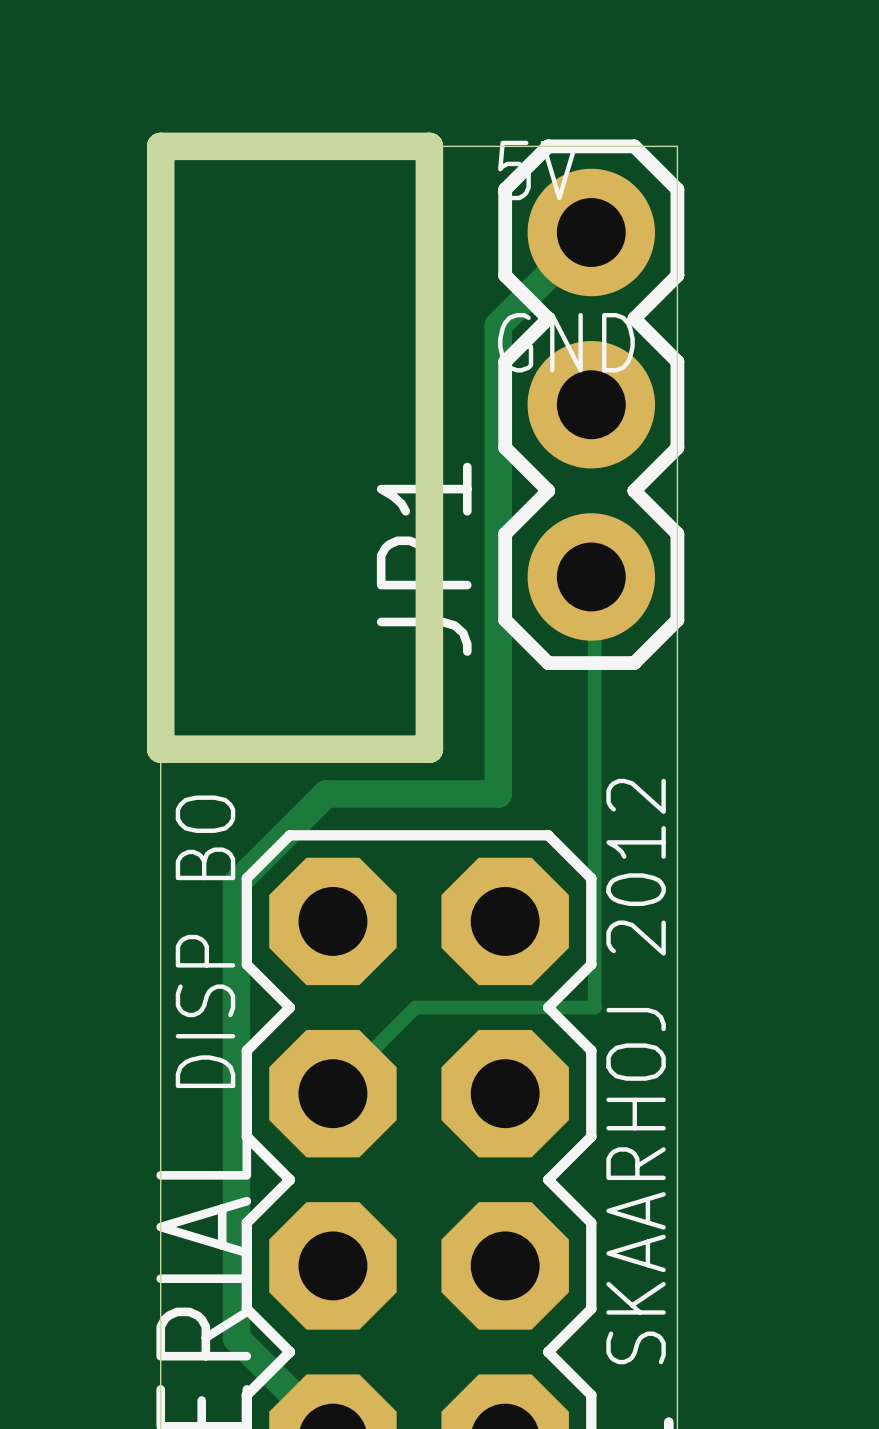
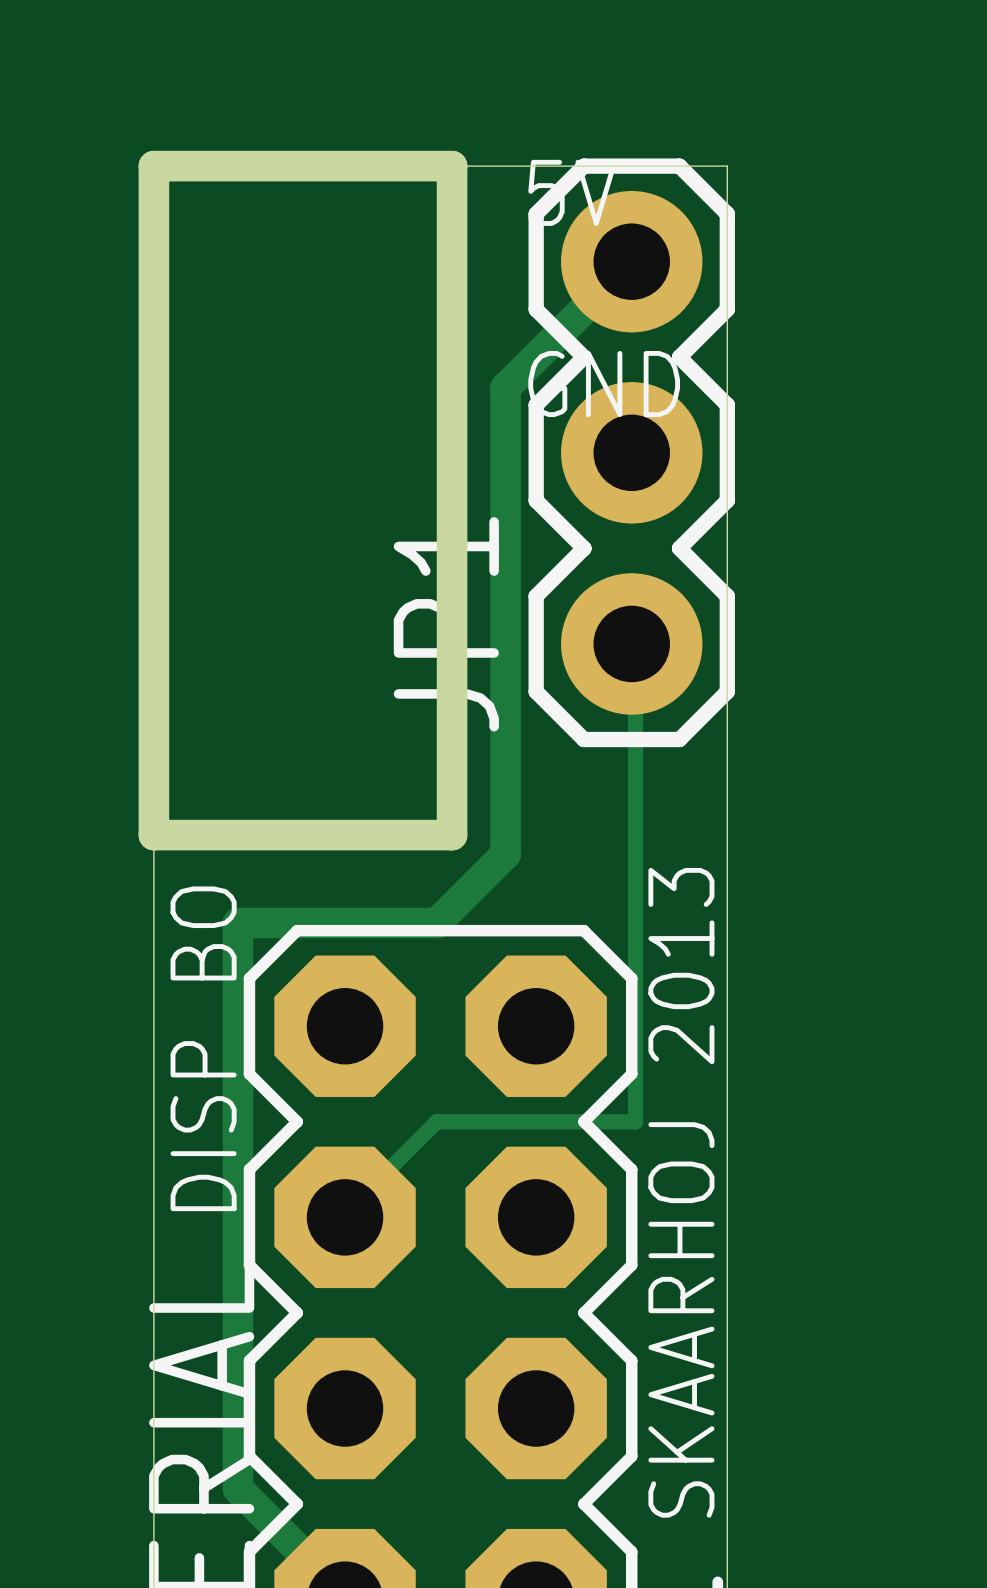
track: (498, 325) (498, 793) (326, 793) (236, 883) -> (528, 364) (505, 387) (505, 854) (436, 923) (237, 923) (237, 984)
text: SKAARHOJ 2012 (636, 1071) -> SKAARHOJ 2013 (681, 1192)

